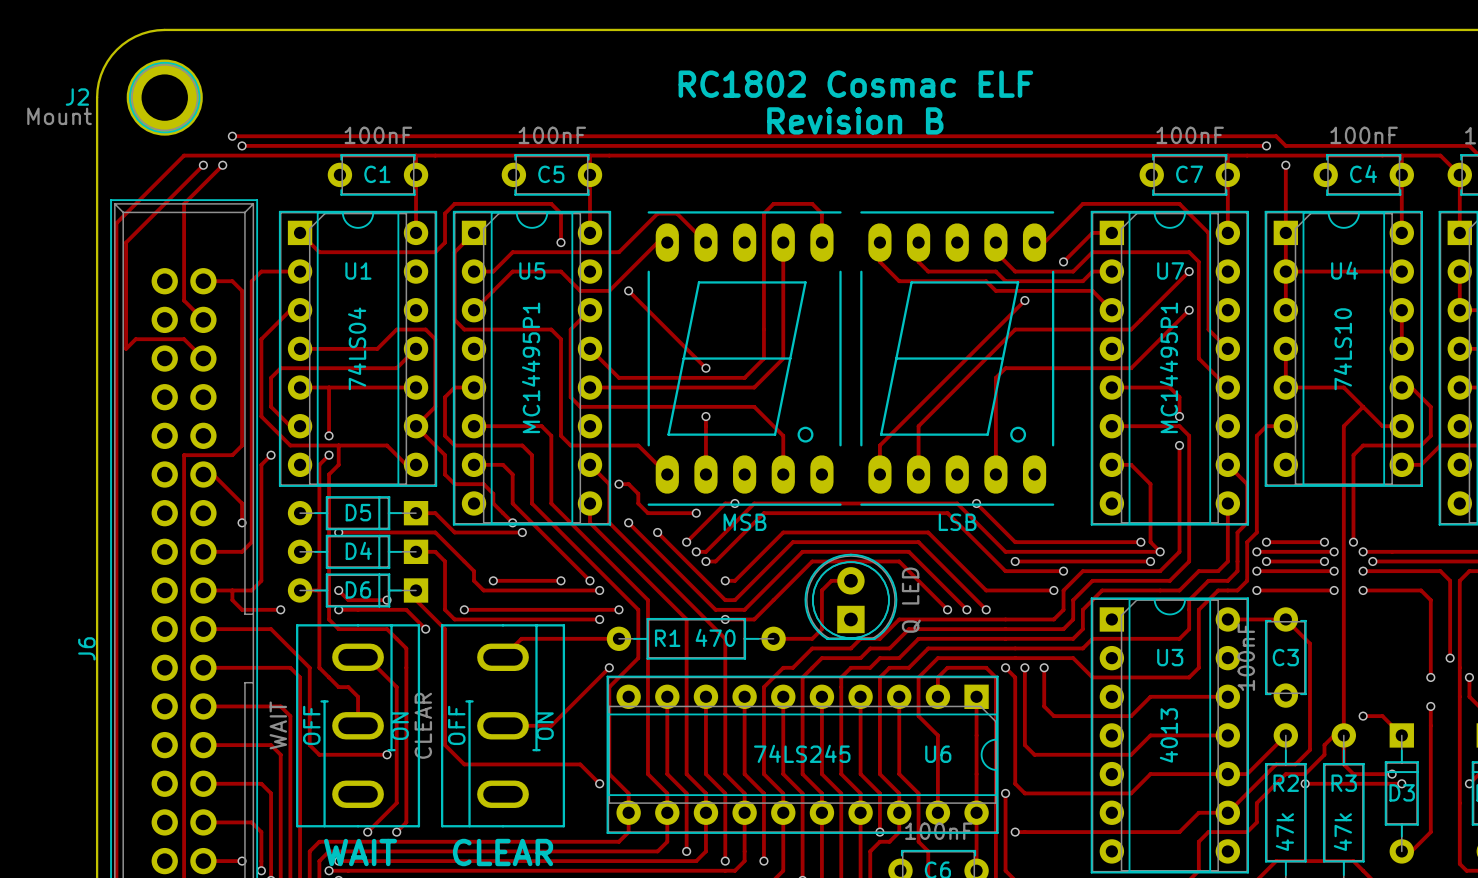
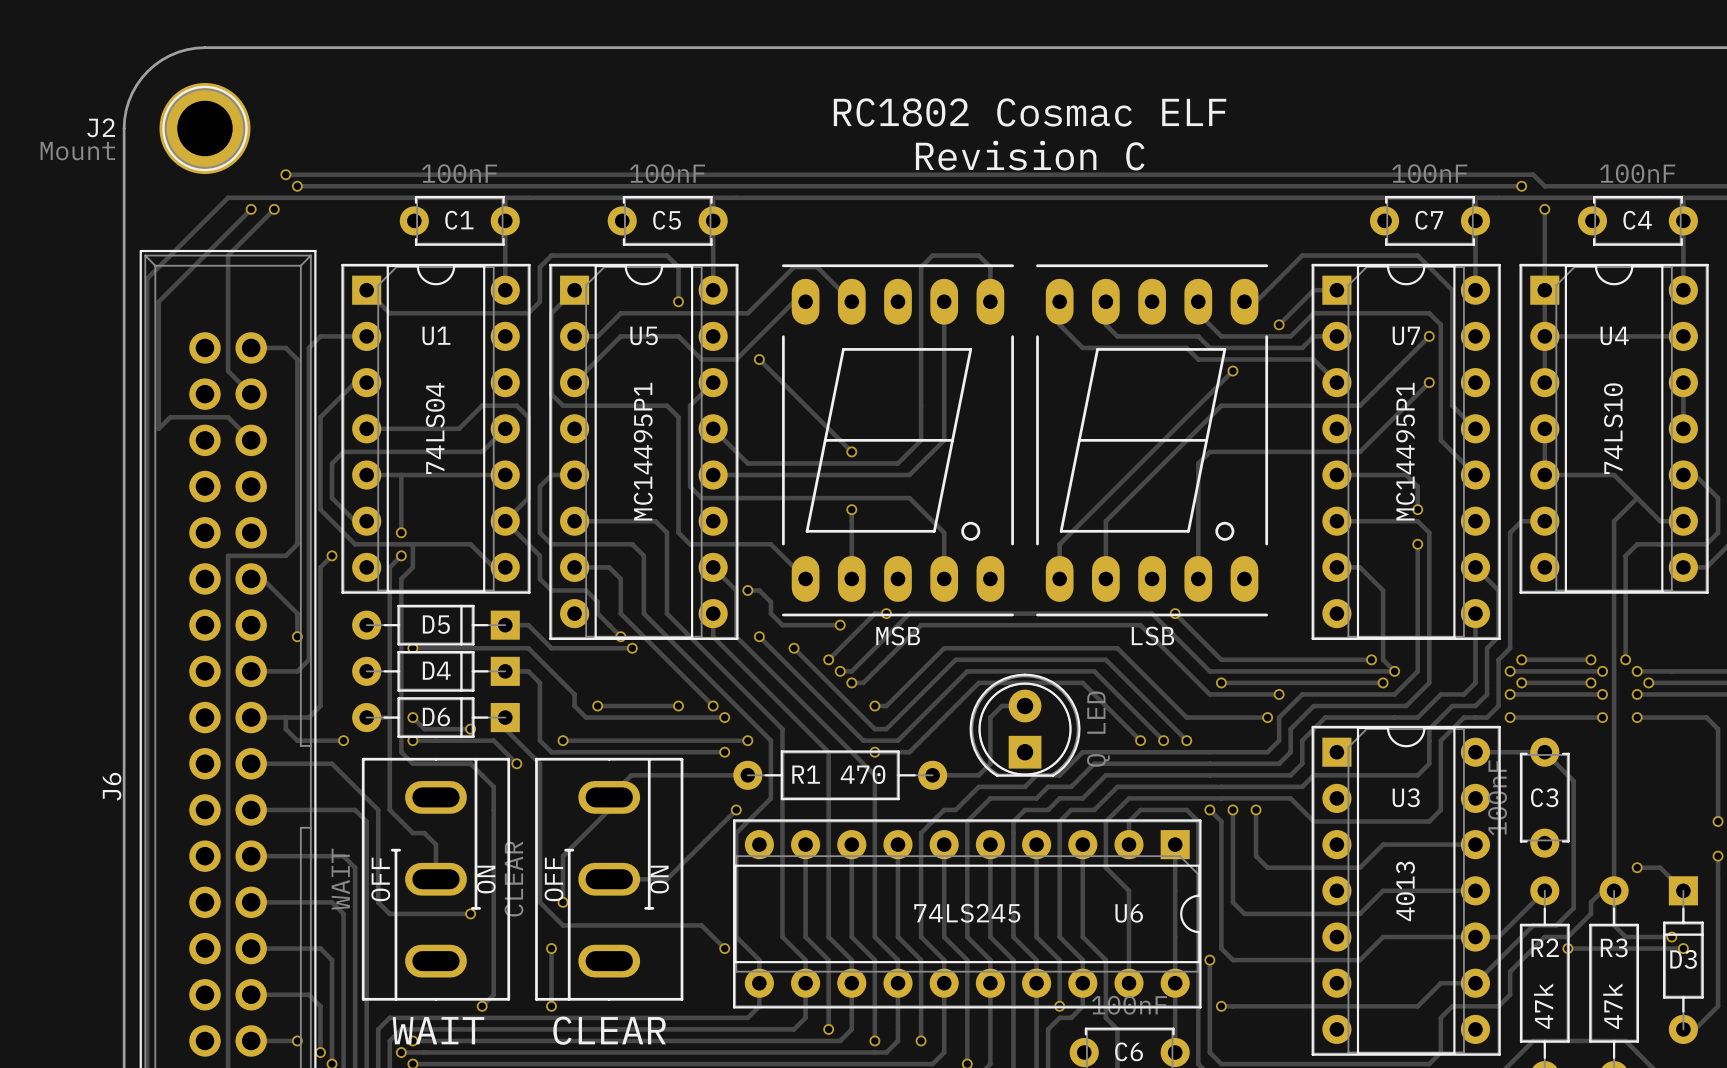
text: Revision B (855, 120) -> Revision C (1030, 155)
track: (366, 657) (396, 687) (396, 803) (367, 832) -> none
track: none -> (609, 797) (609, 809) (563, 856) (563, 902)
via: none -> (563, 902)
track: none -> (551, 948) (551, 1006)
via: none -> (551, 948)
via: (367, 832) -> none
via: none -> (551, 1006)

